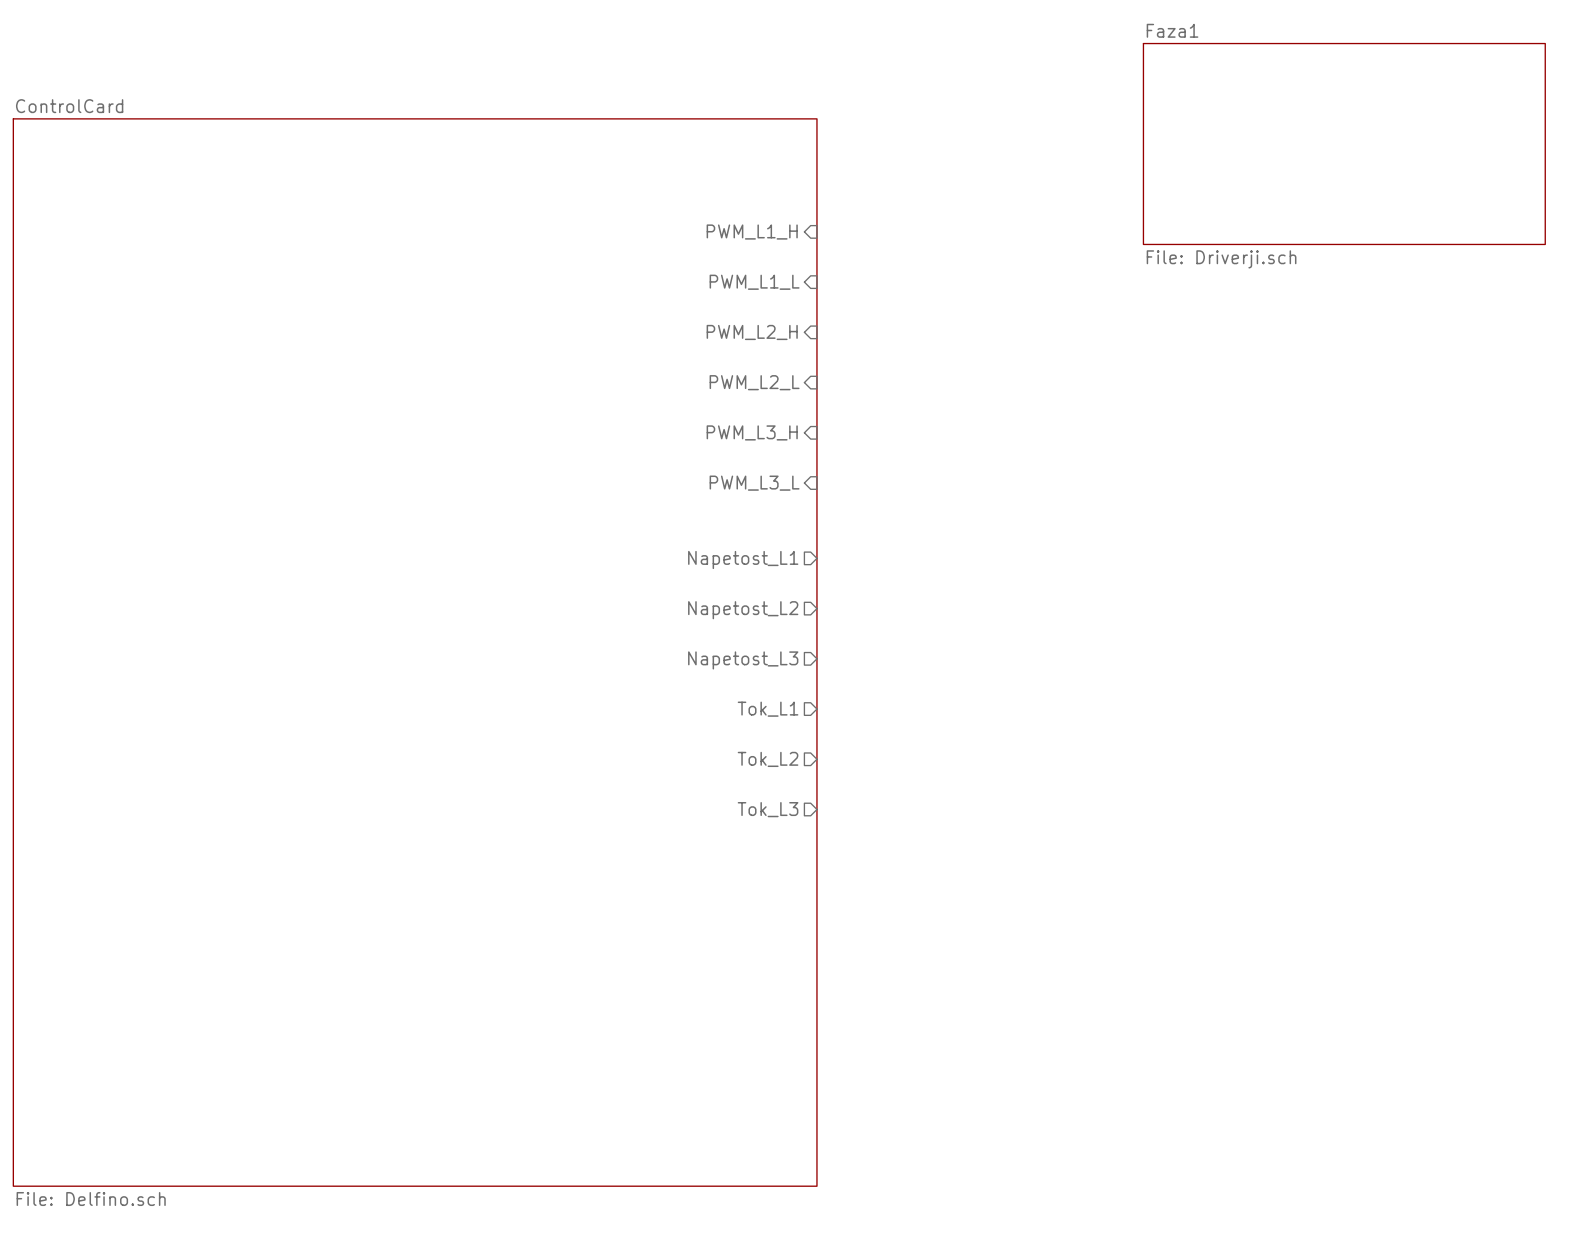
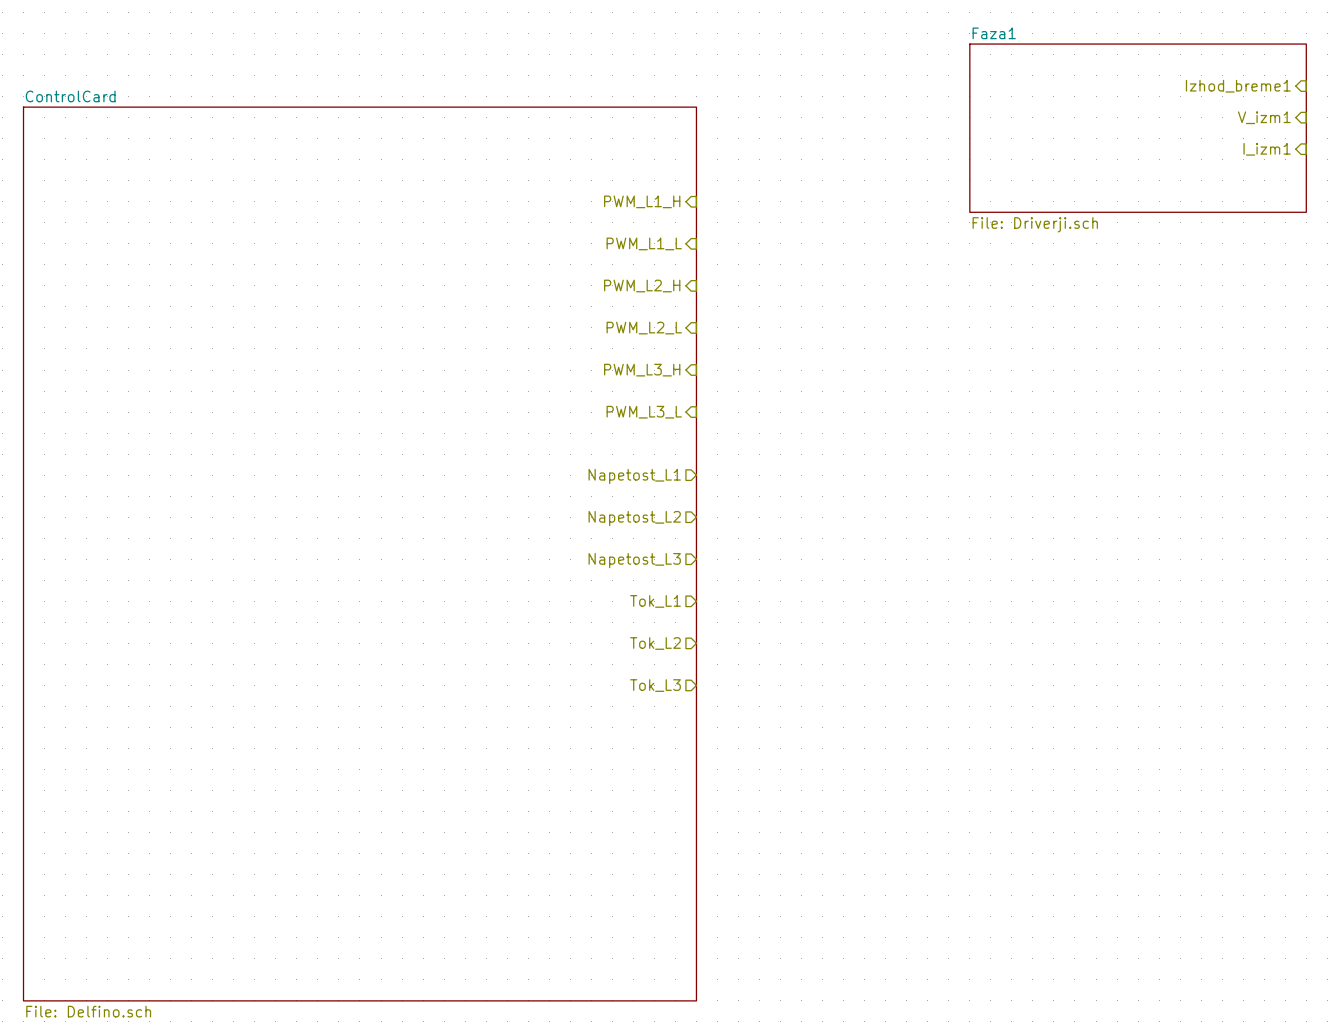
hierarchical label: none -> Izhod_breme1 (1238, 86)
hierarchical label: none -> V_izm1 (1264, 117)
hierarchical label: none -> I_izm1 (1267, 149)

